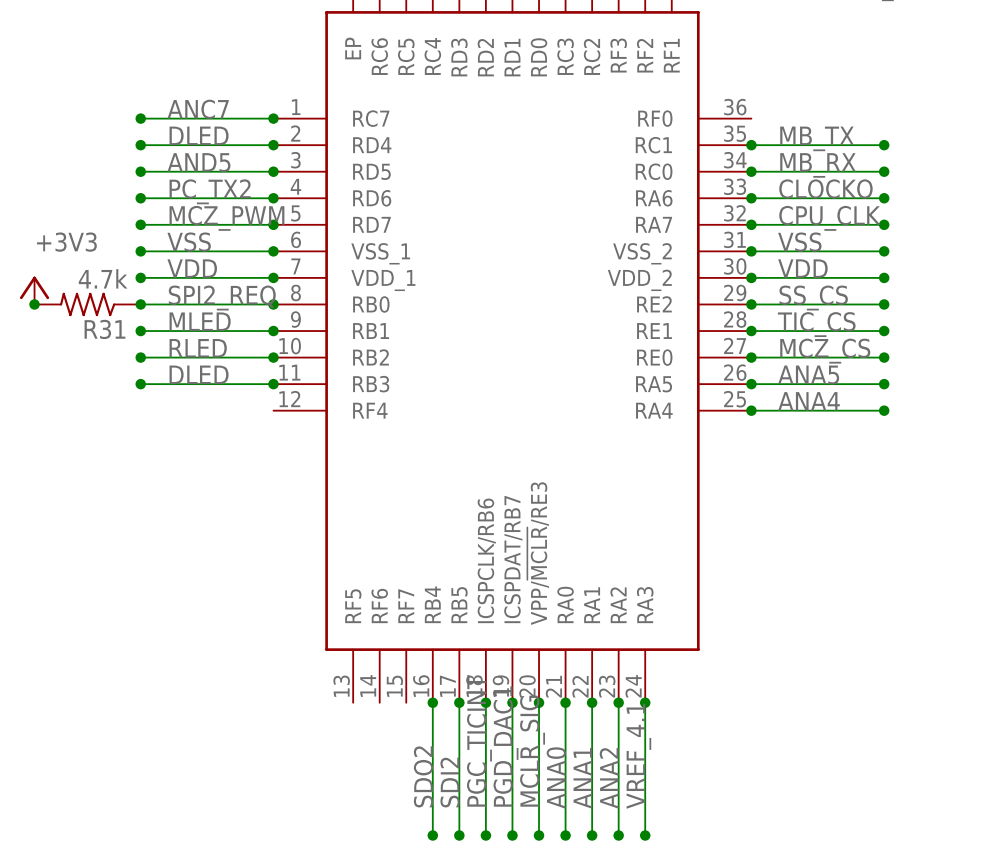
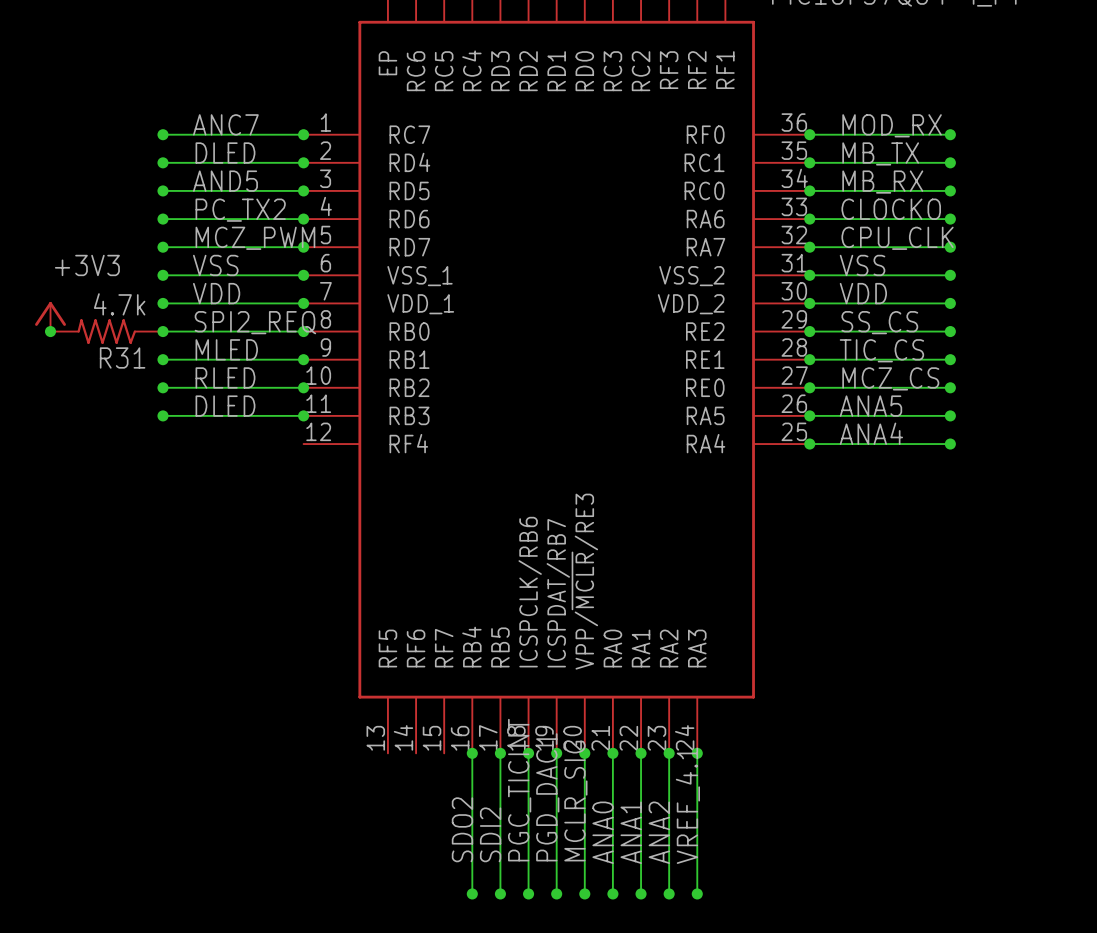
label: none -> MOD_RX (892, 125)
wire: none -> (809, 134) (950, 134)
junction: none -> (809, 134)
junction: none -> (950, 134)

